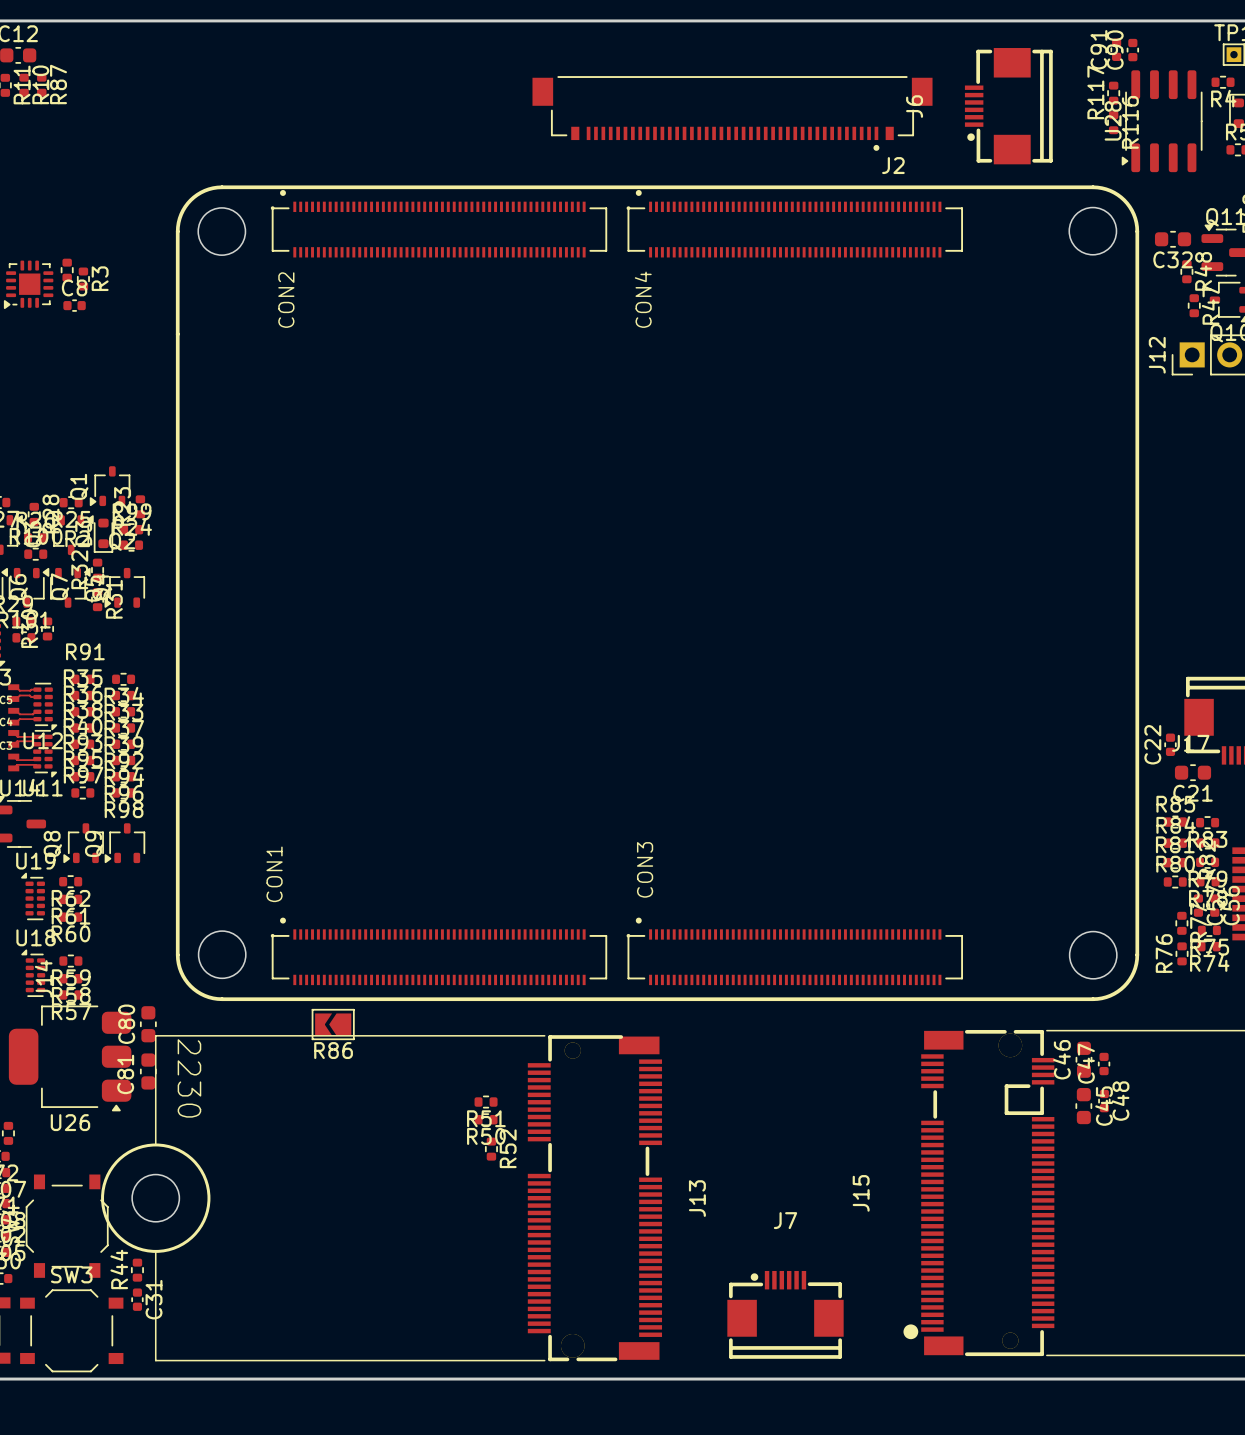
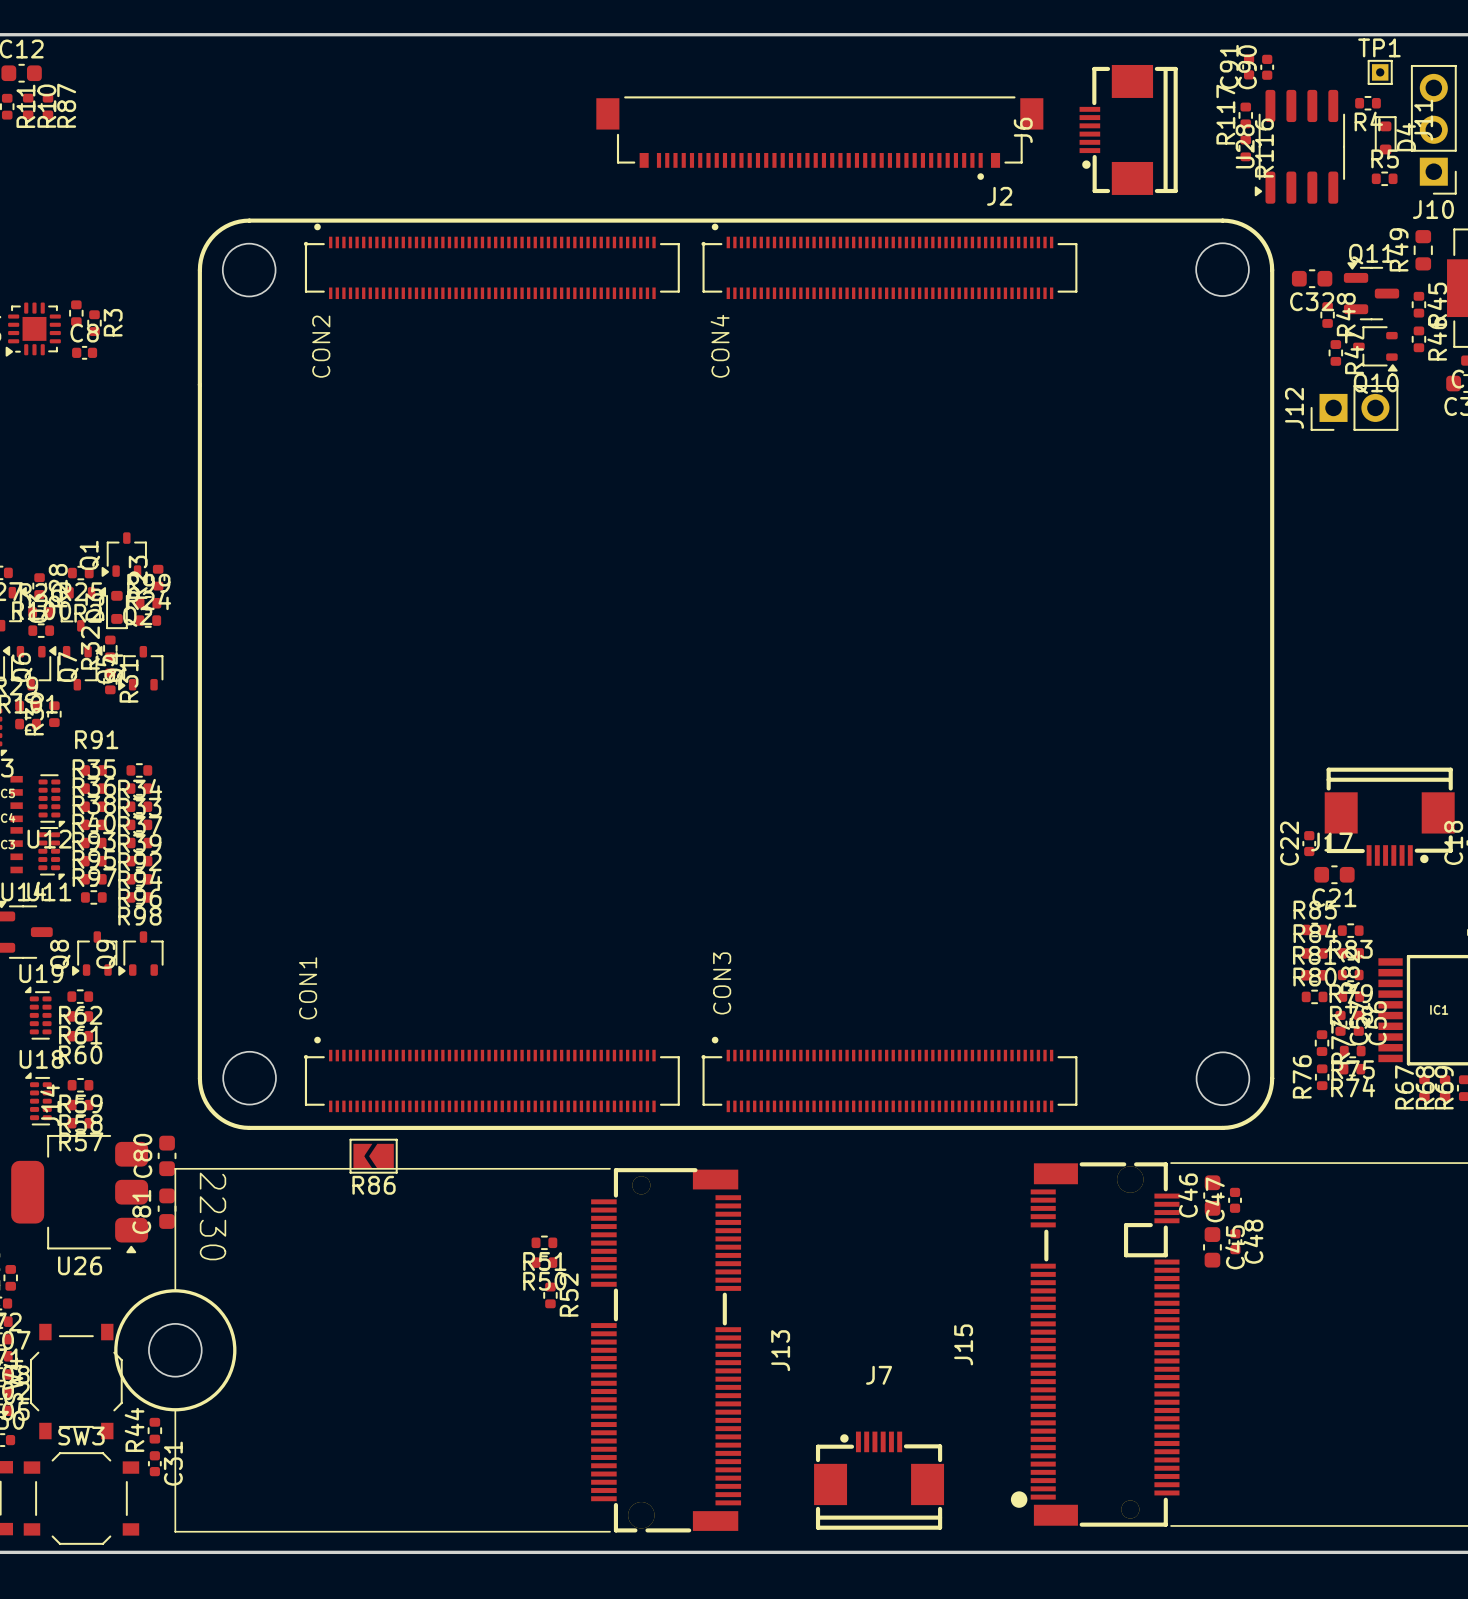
top track: (13, 687) (19, 690) (37, 689) -> none
top track: (37, 697) (19, 695) (13, 699) -> none
top track: (13, 710) (19, 714) (33, 714) (37, 711) -> none
top track: (37, 719) (19, 719) (13, 722) -> none
top track: (13, 732) (17, 736) (37, 736) -> none
top track: (37, 744) (32, 741) (17, 741) (13, 744) -> none
top track: (13, 756) (17, 760) (37, 759) -> none
top track: (37, 766) (17, 764) (13, 768) -> none

